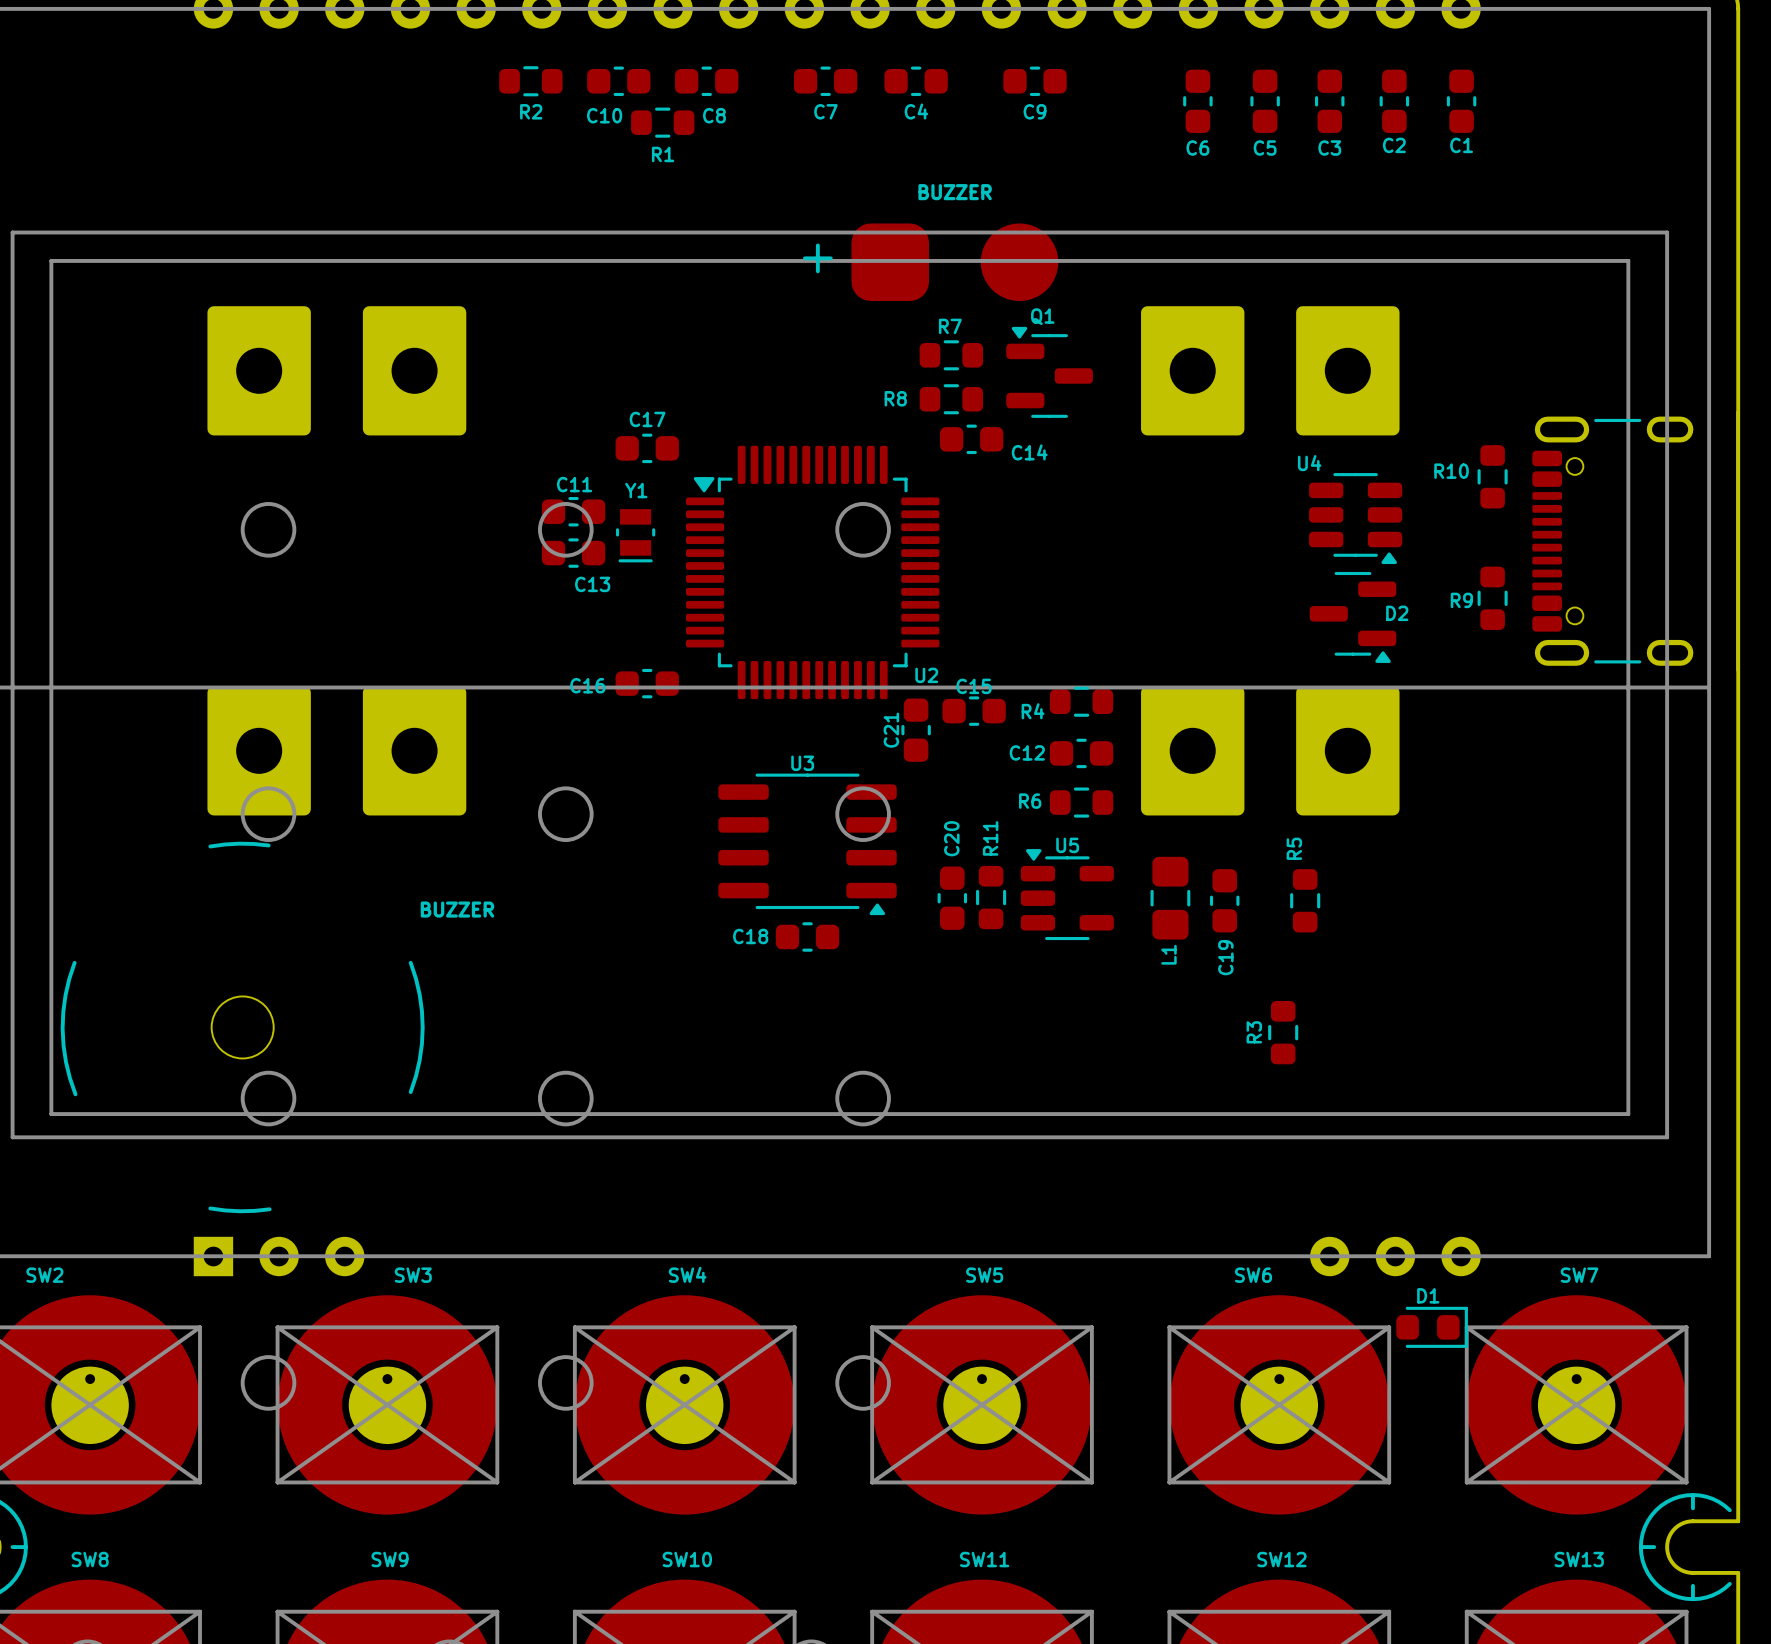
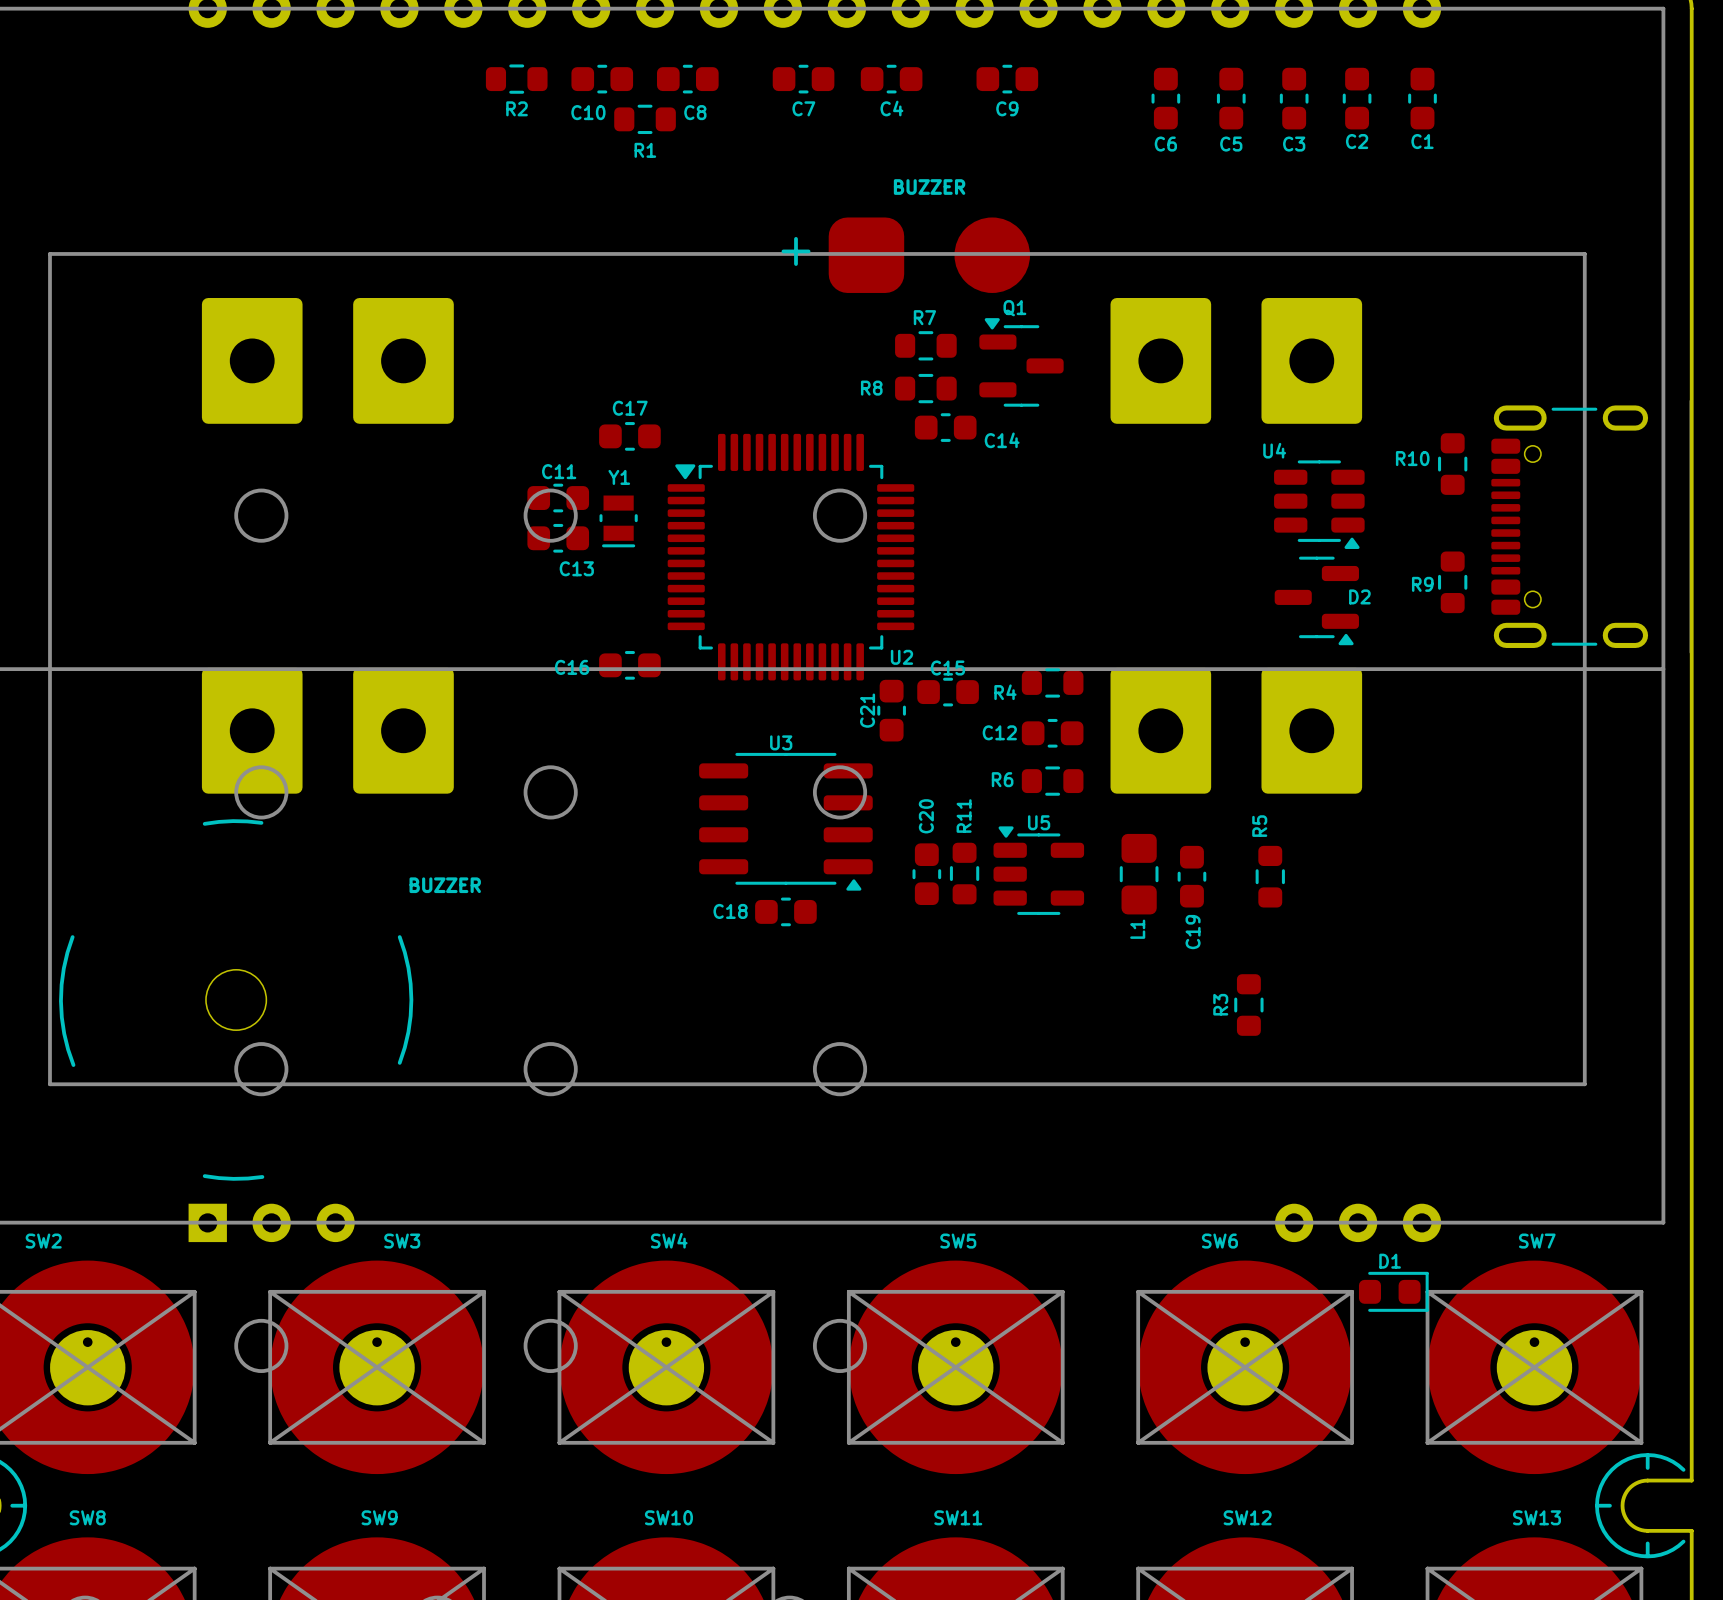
line: (12, 232) (1667, 232) (1667, 1137) (12, 1137) (12, 232) -> none

